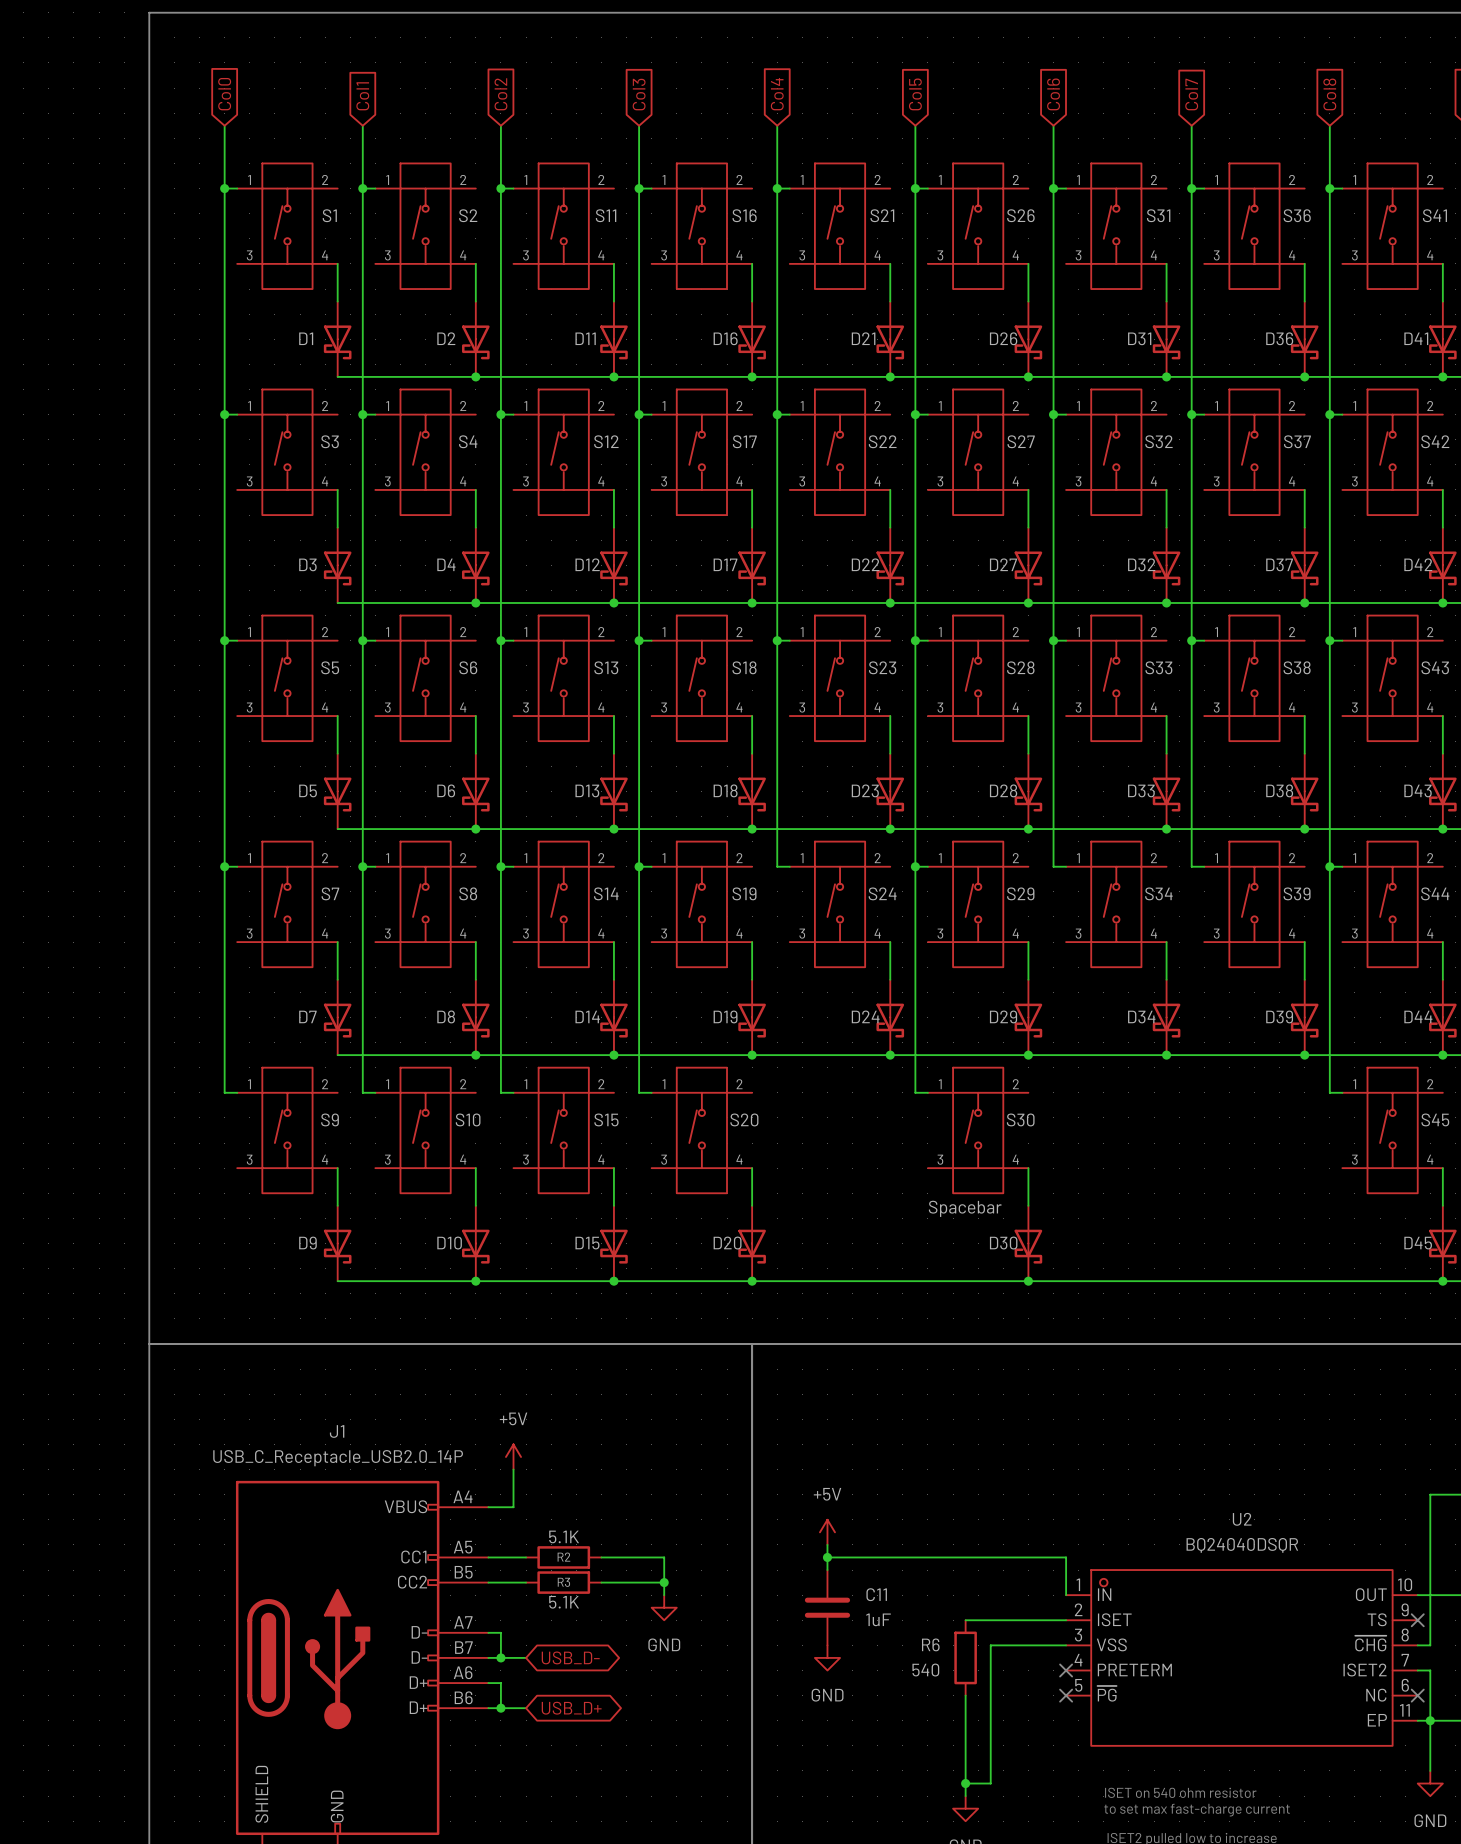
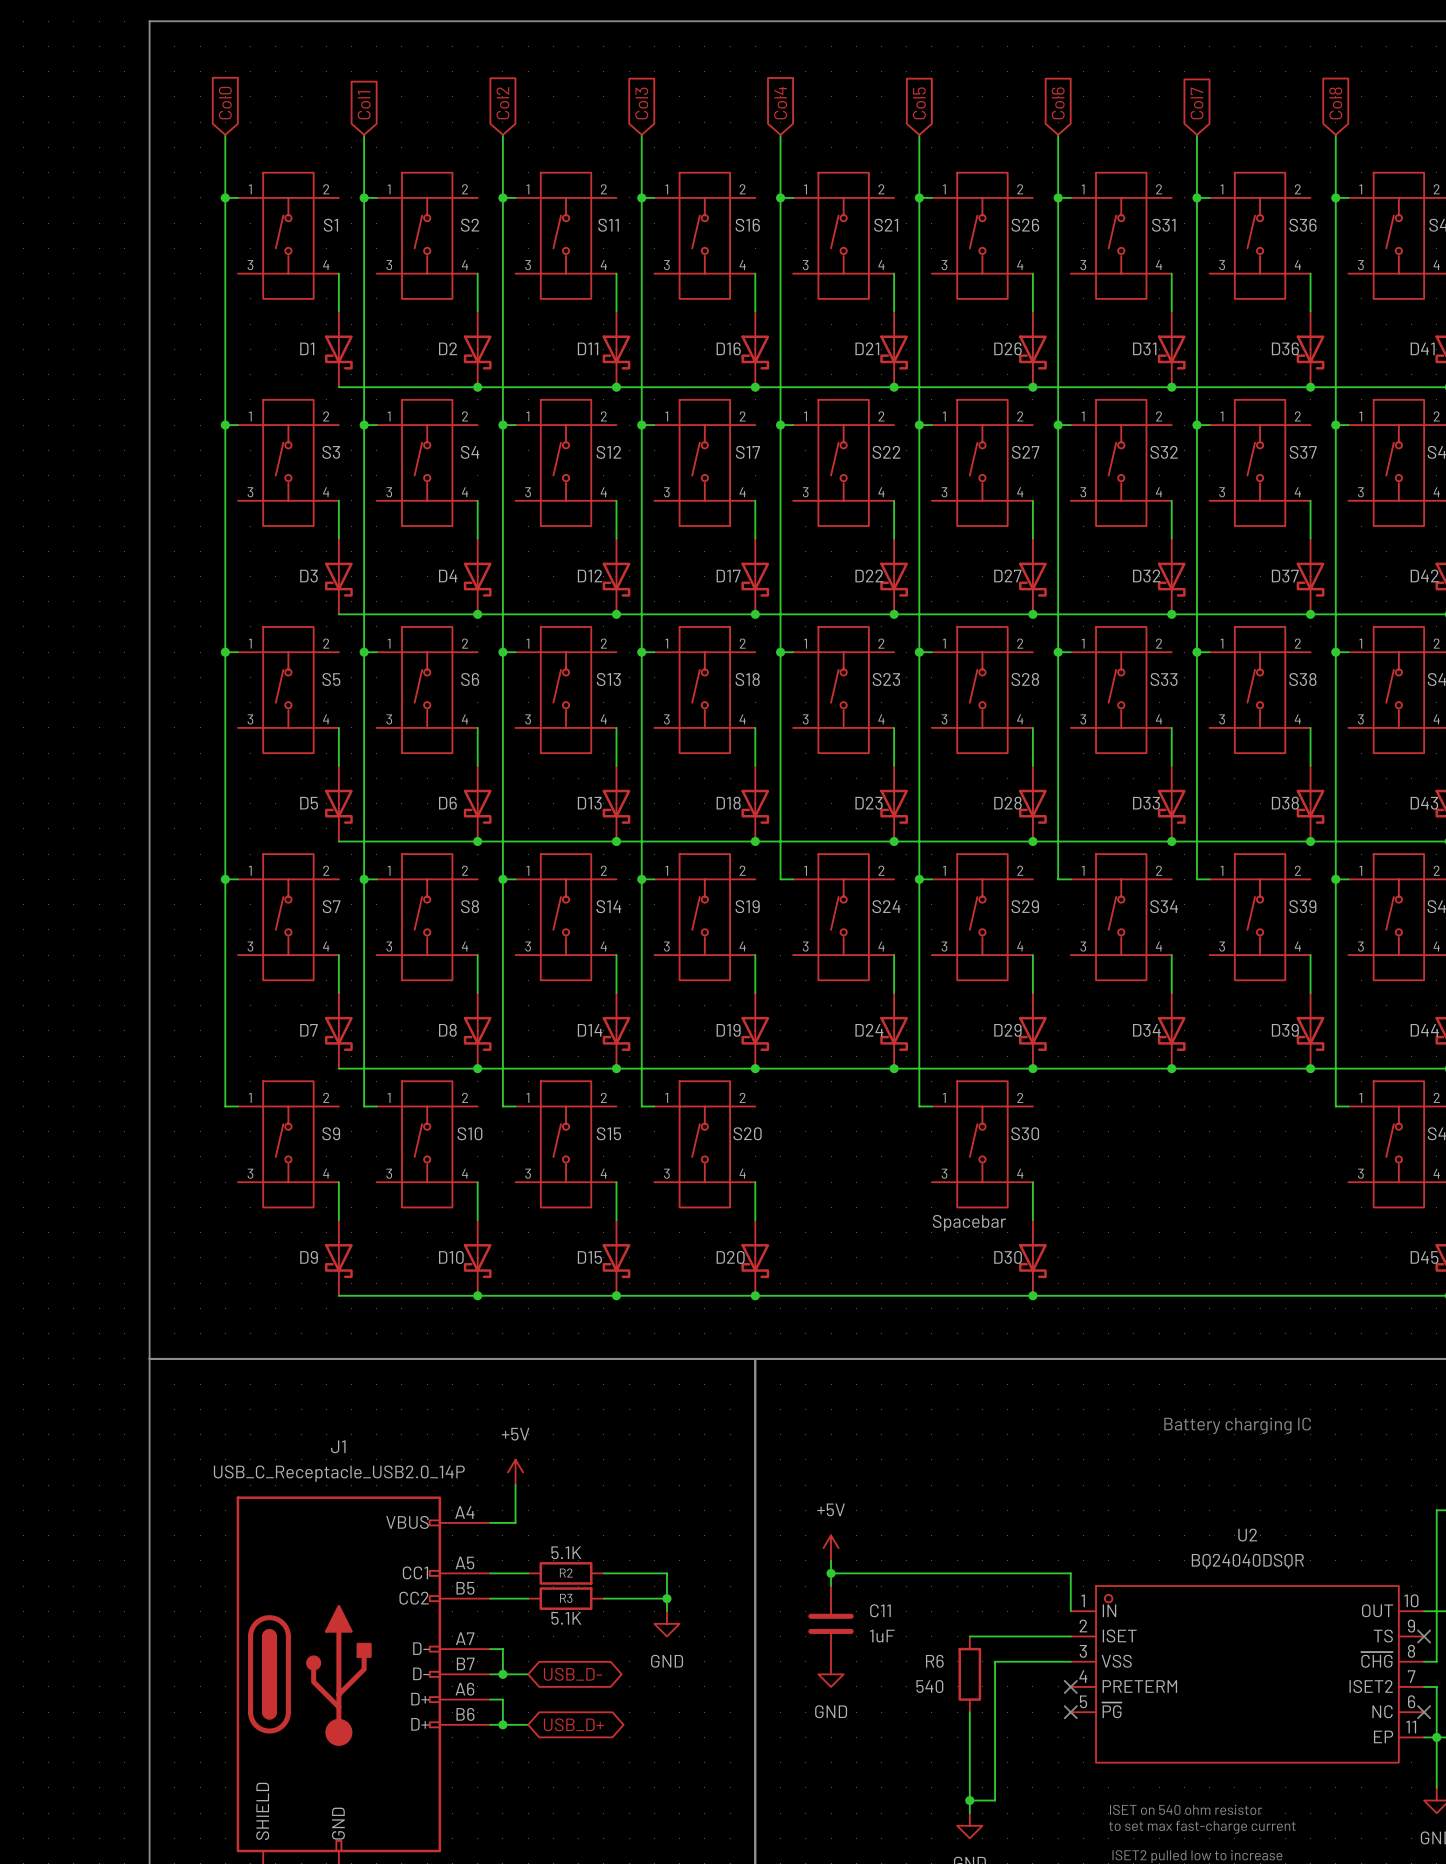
text: none -> Battery charging IC (1237, 1425)

